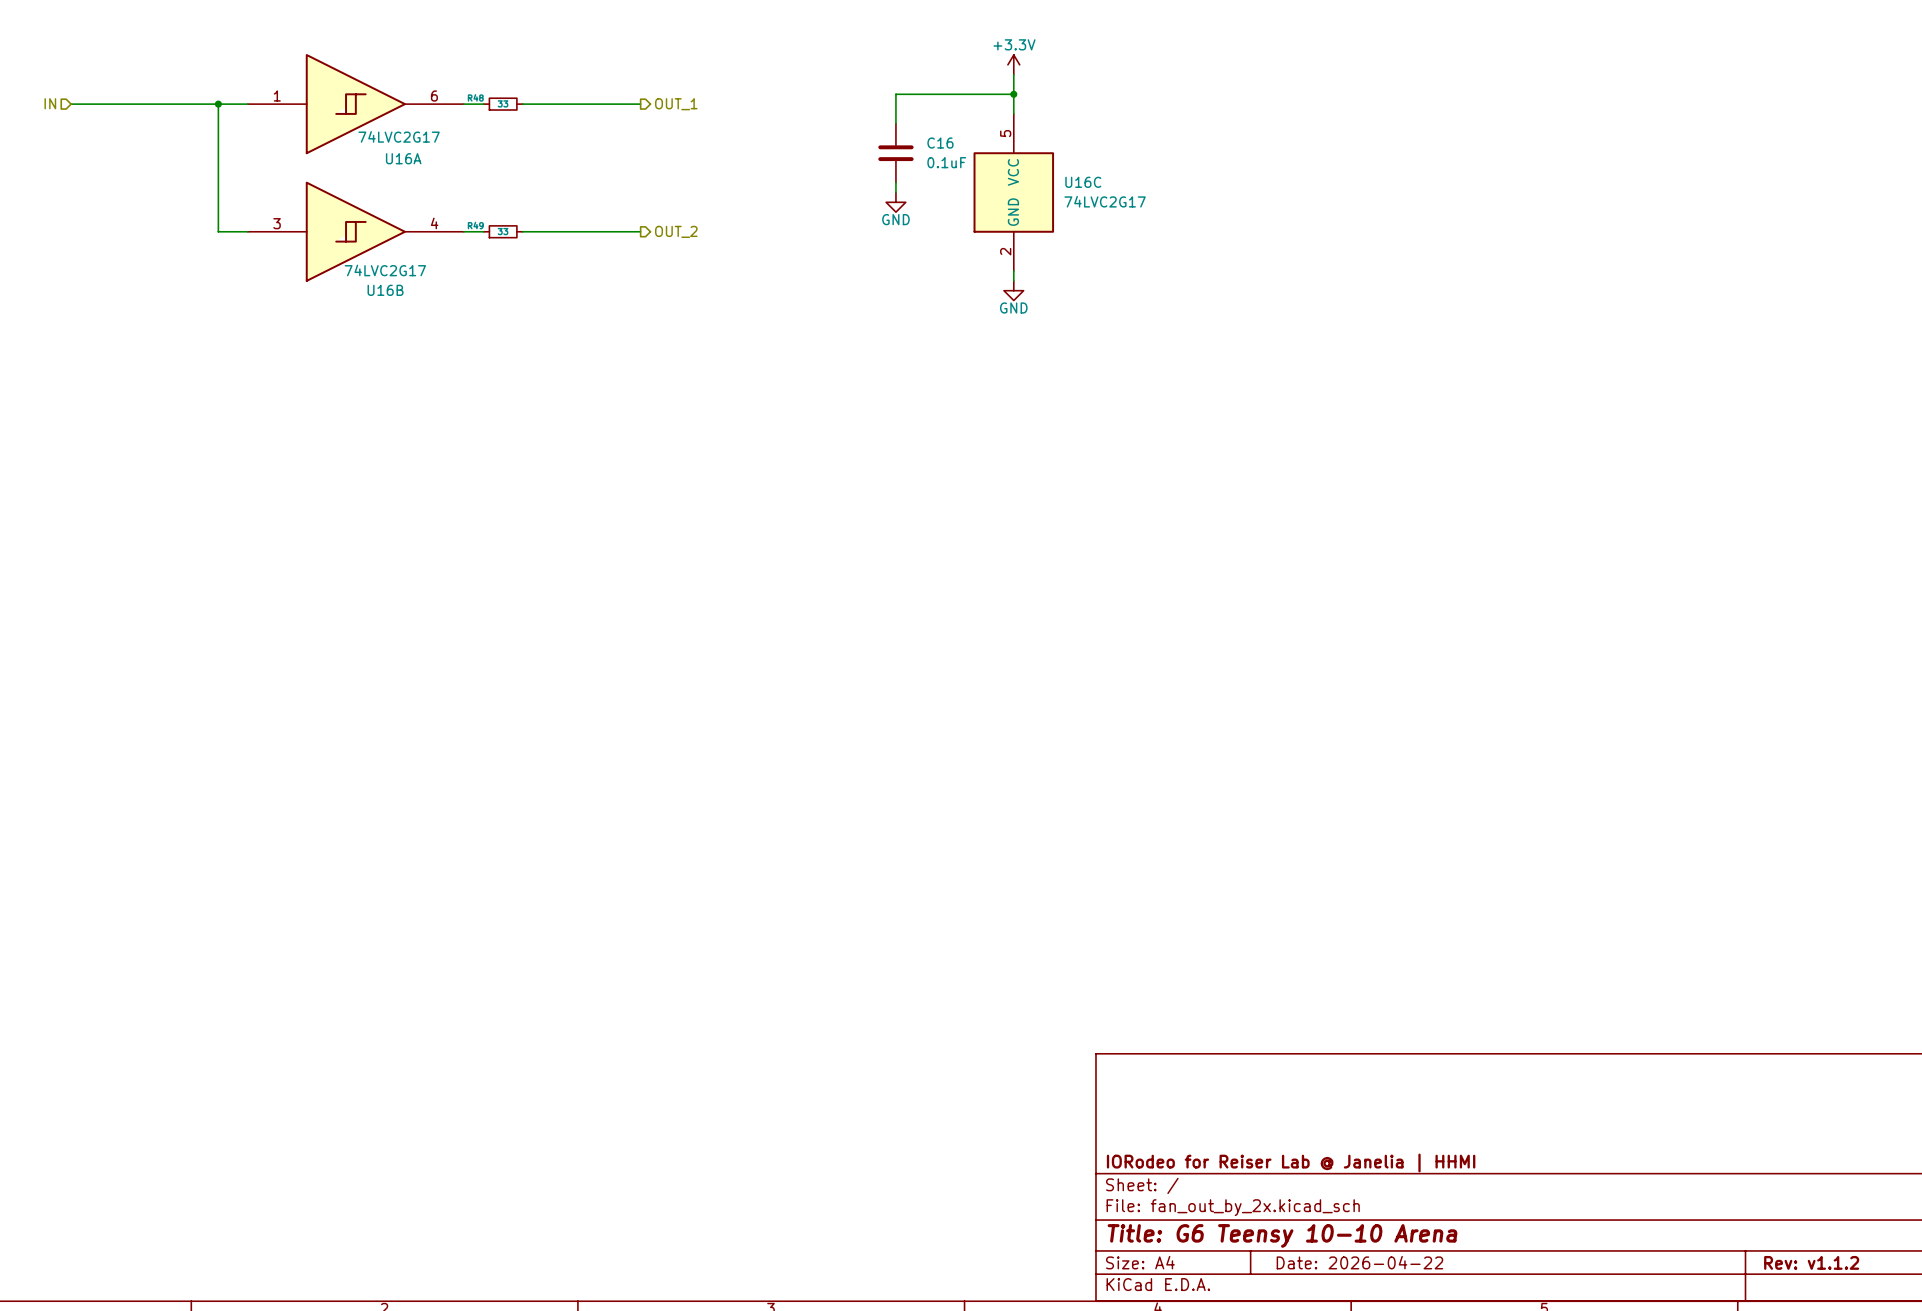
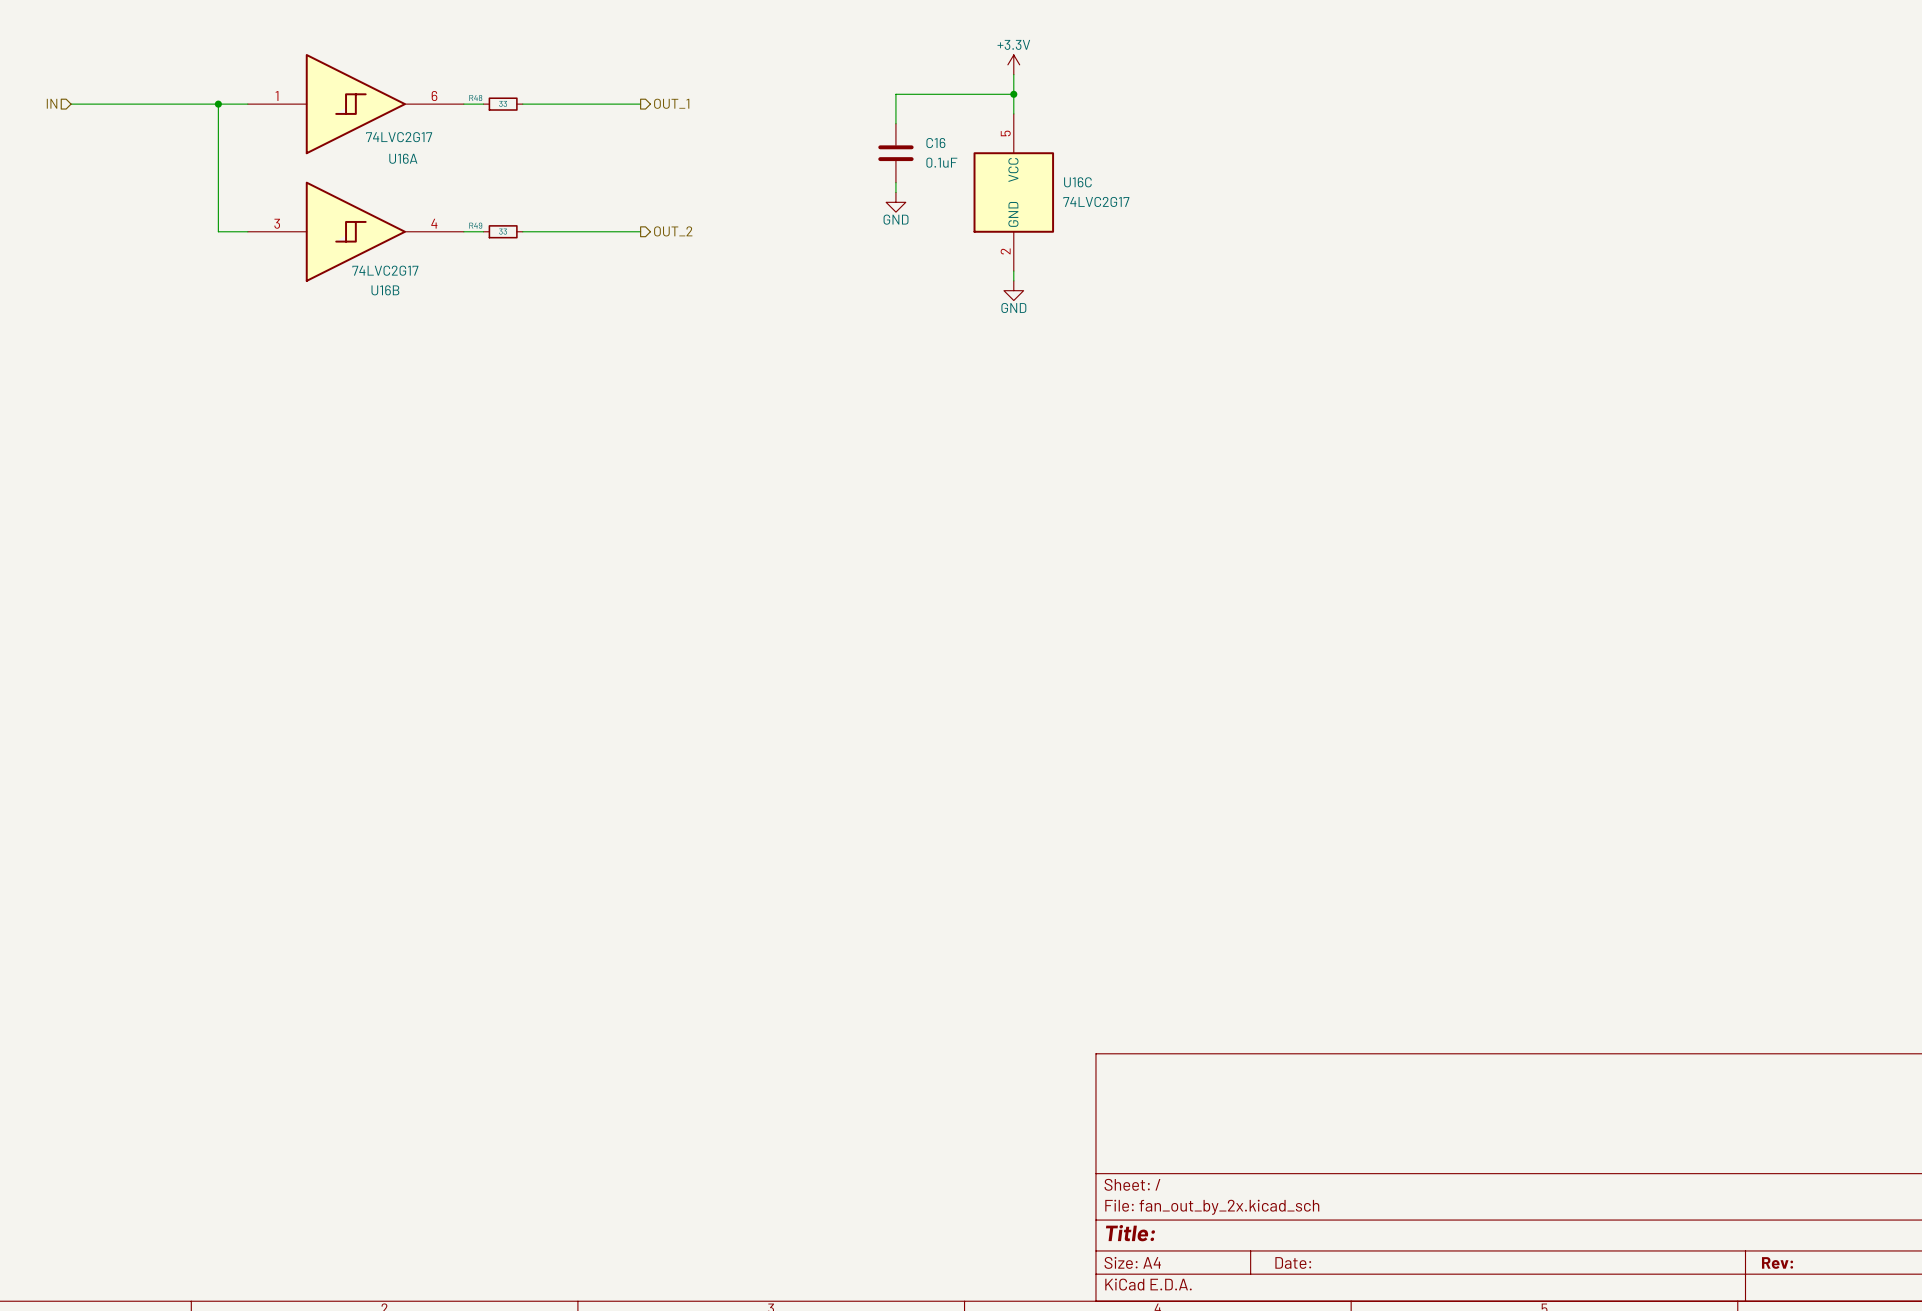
title block: IORodeo for Reiser Lab @ Janelia | HHMI (1291, 1162) -> none
title block: Title: G6 Teensy 10-10 Arena (1282, 1235) -> Title: (1130, 1233)
title block: Date: 2026-04-22 (1359, 1262) -> Date: (1293, 1262)
title block: Rev: v1.1.2 (1811, 1262) -> Rev: (1777, 1262)

